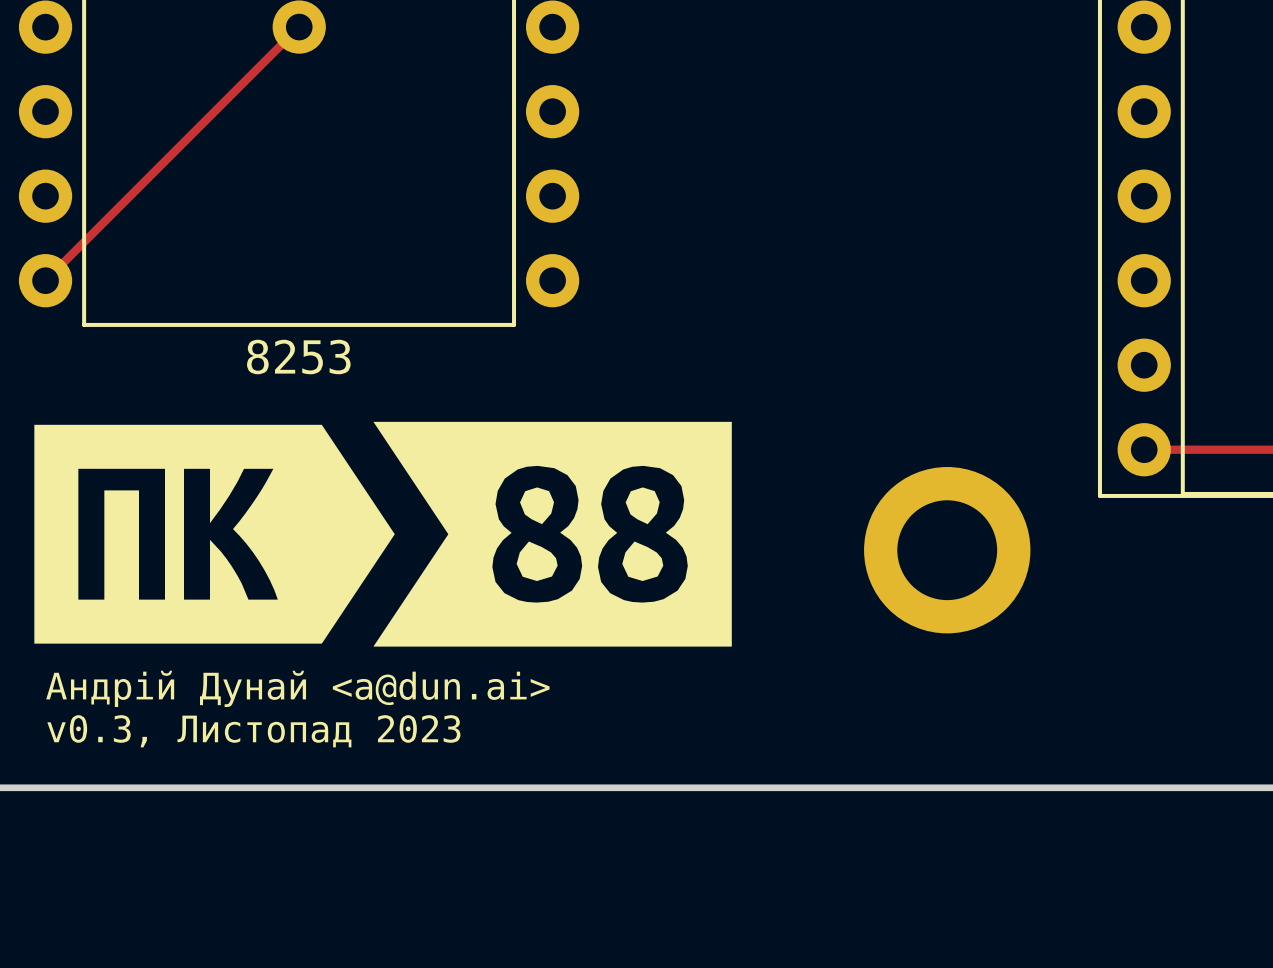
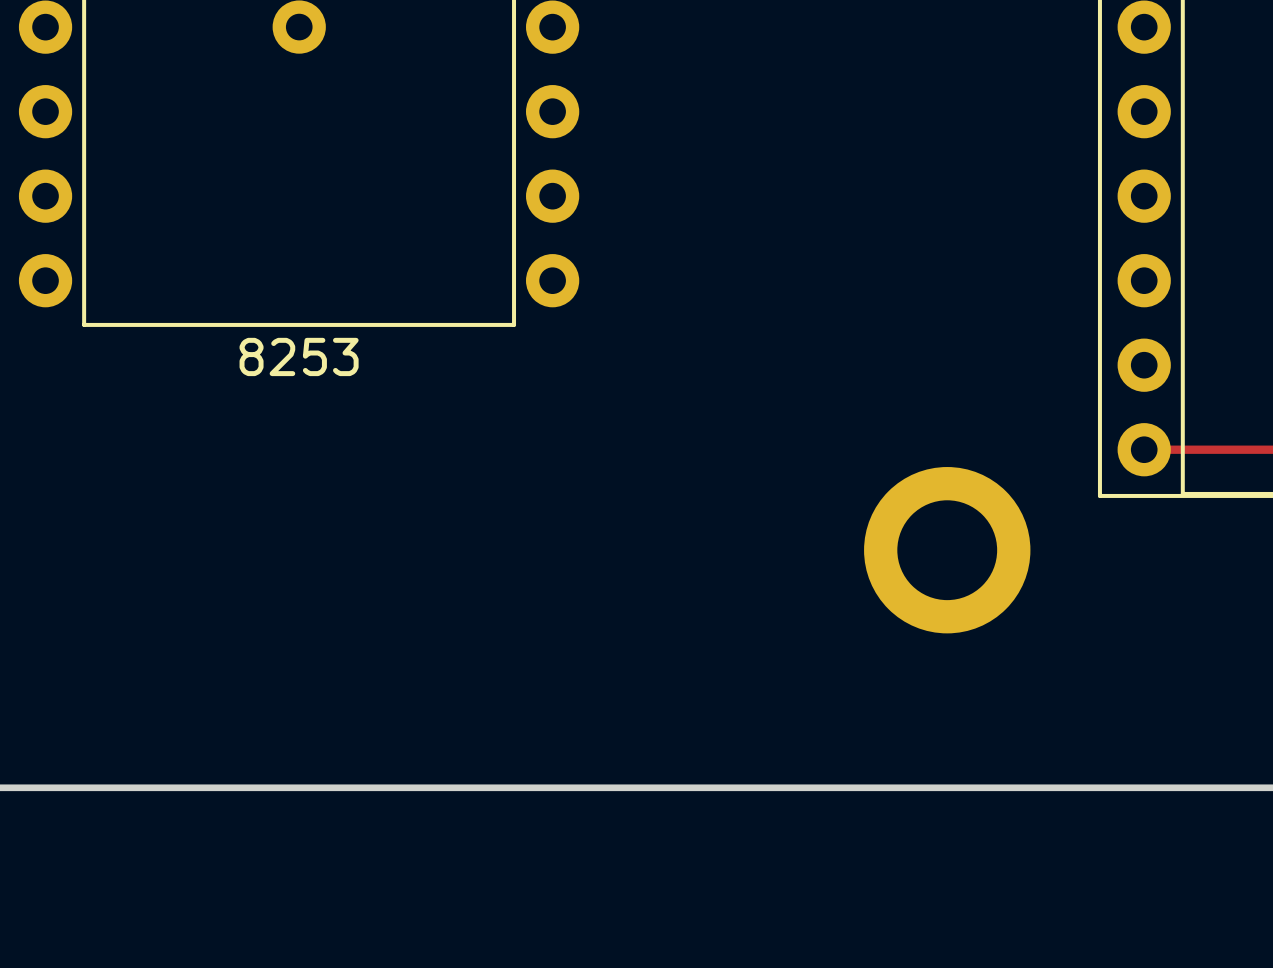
track: (299, 27) (45, 280) -> none
drawing: [34, 421, 732, 647] -> none
text: Андрій Дунай <a@dun.ai> (297, 688) -> none
text: v0.3, Листопад 2023 (253, 731) -> none

